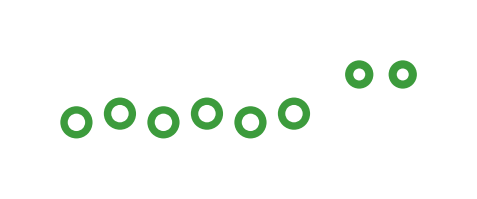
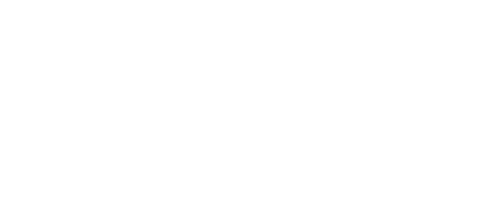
part: (380, 74) -> none
part: (185, 117) -> none

